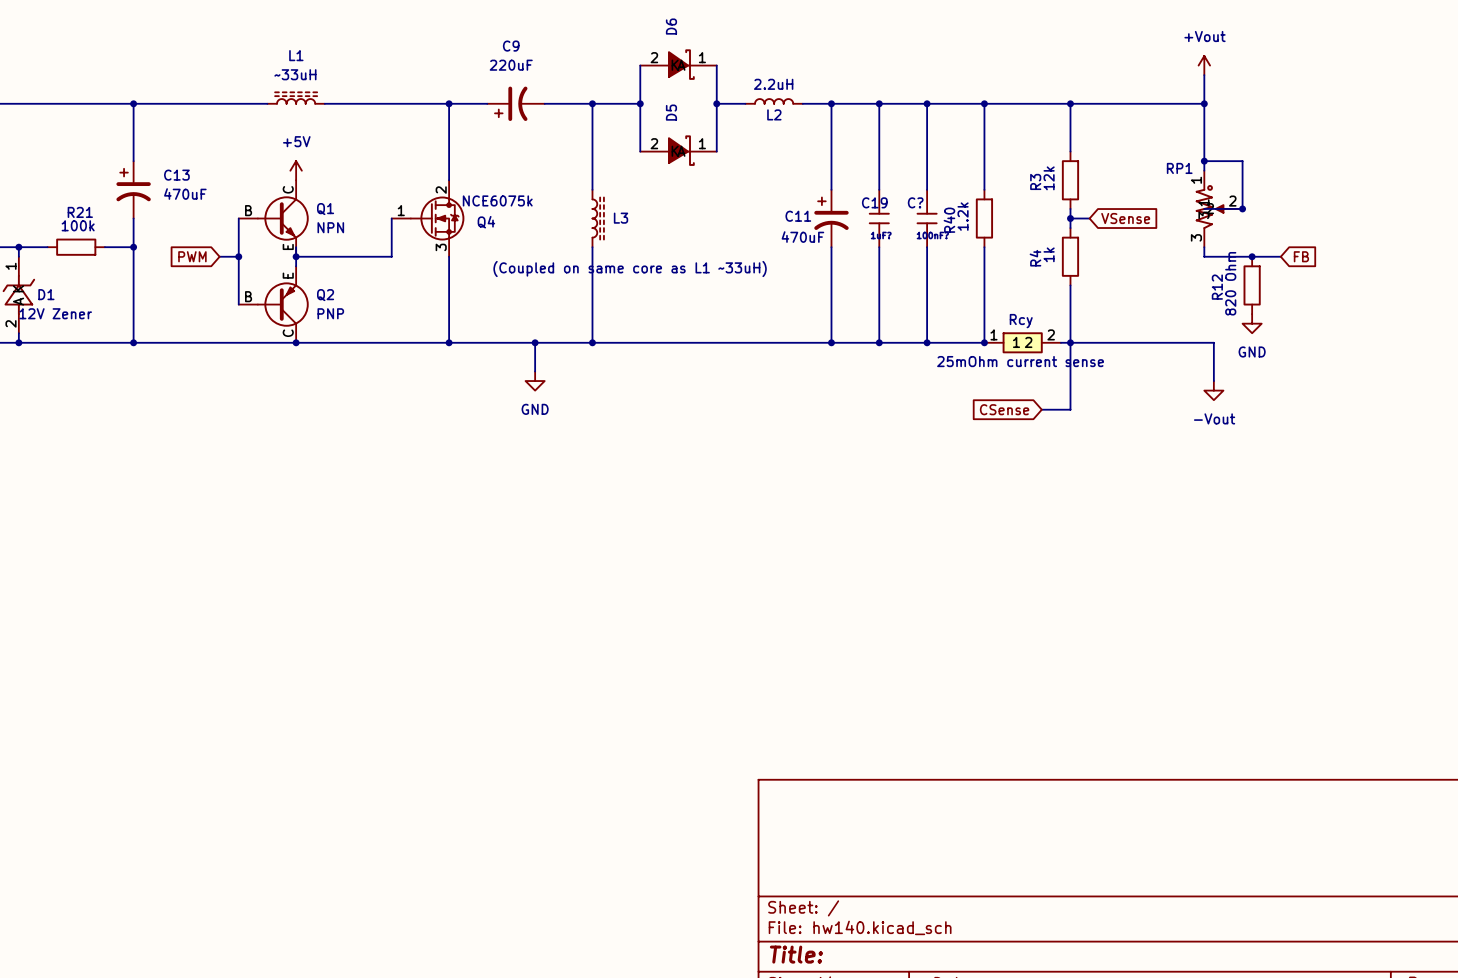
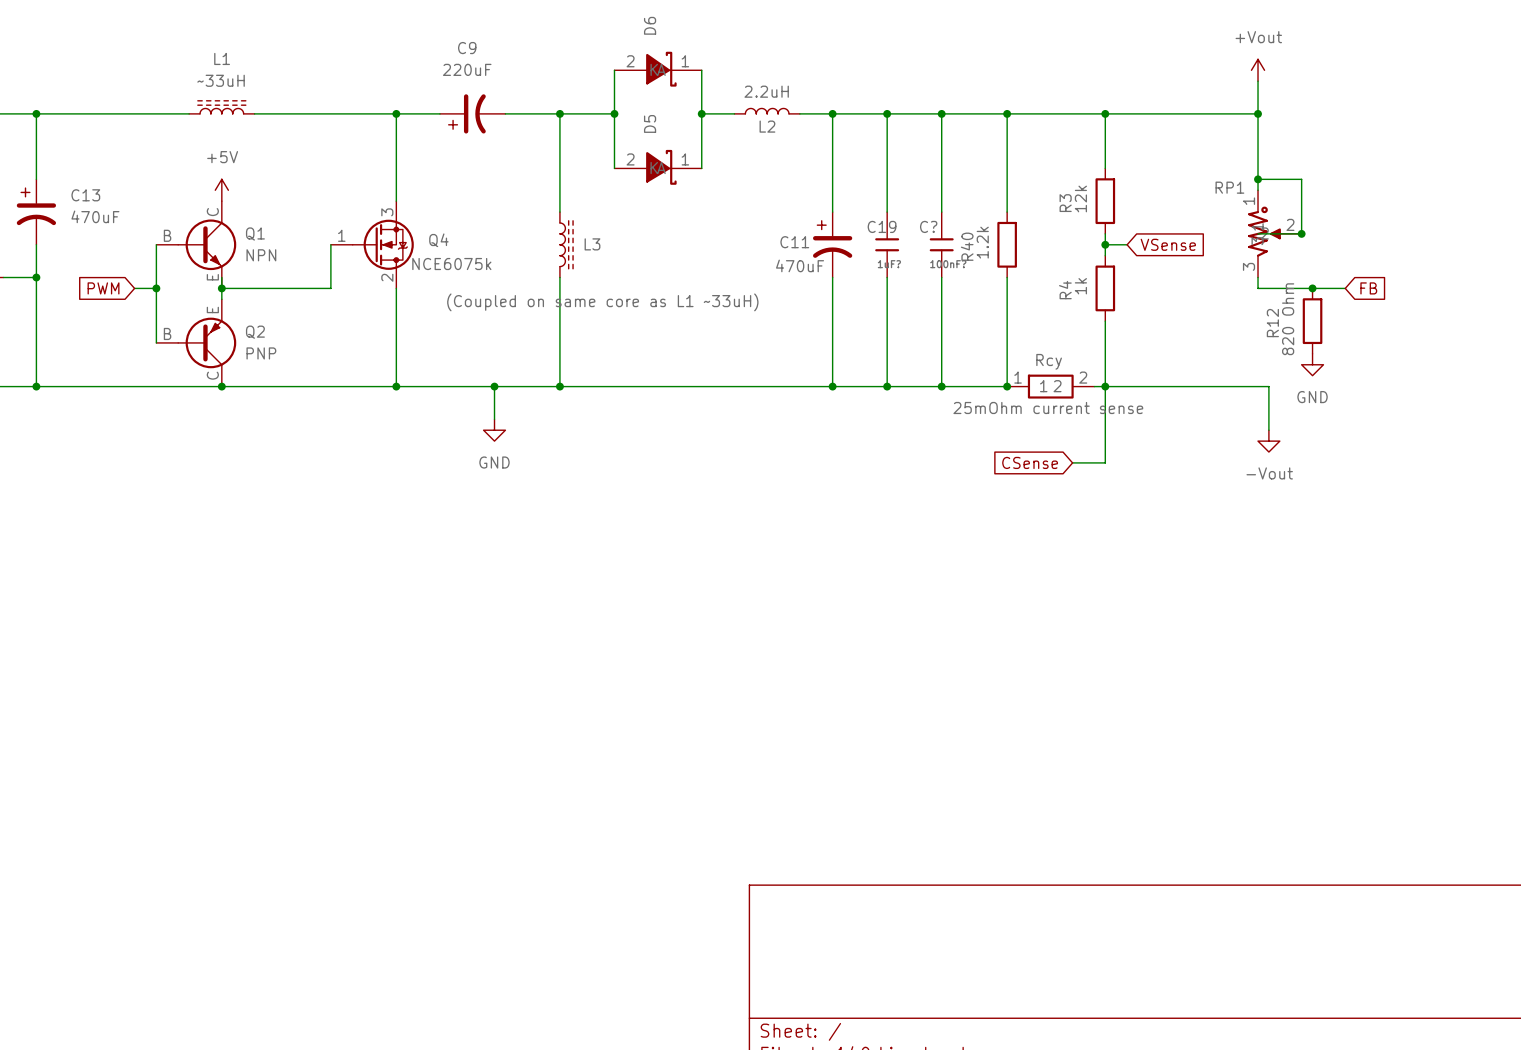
Q4 flip: as is (437, 218) -> up-down (383, 244)

